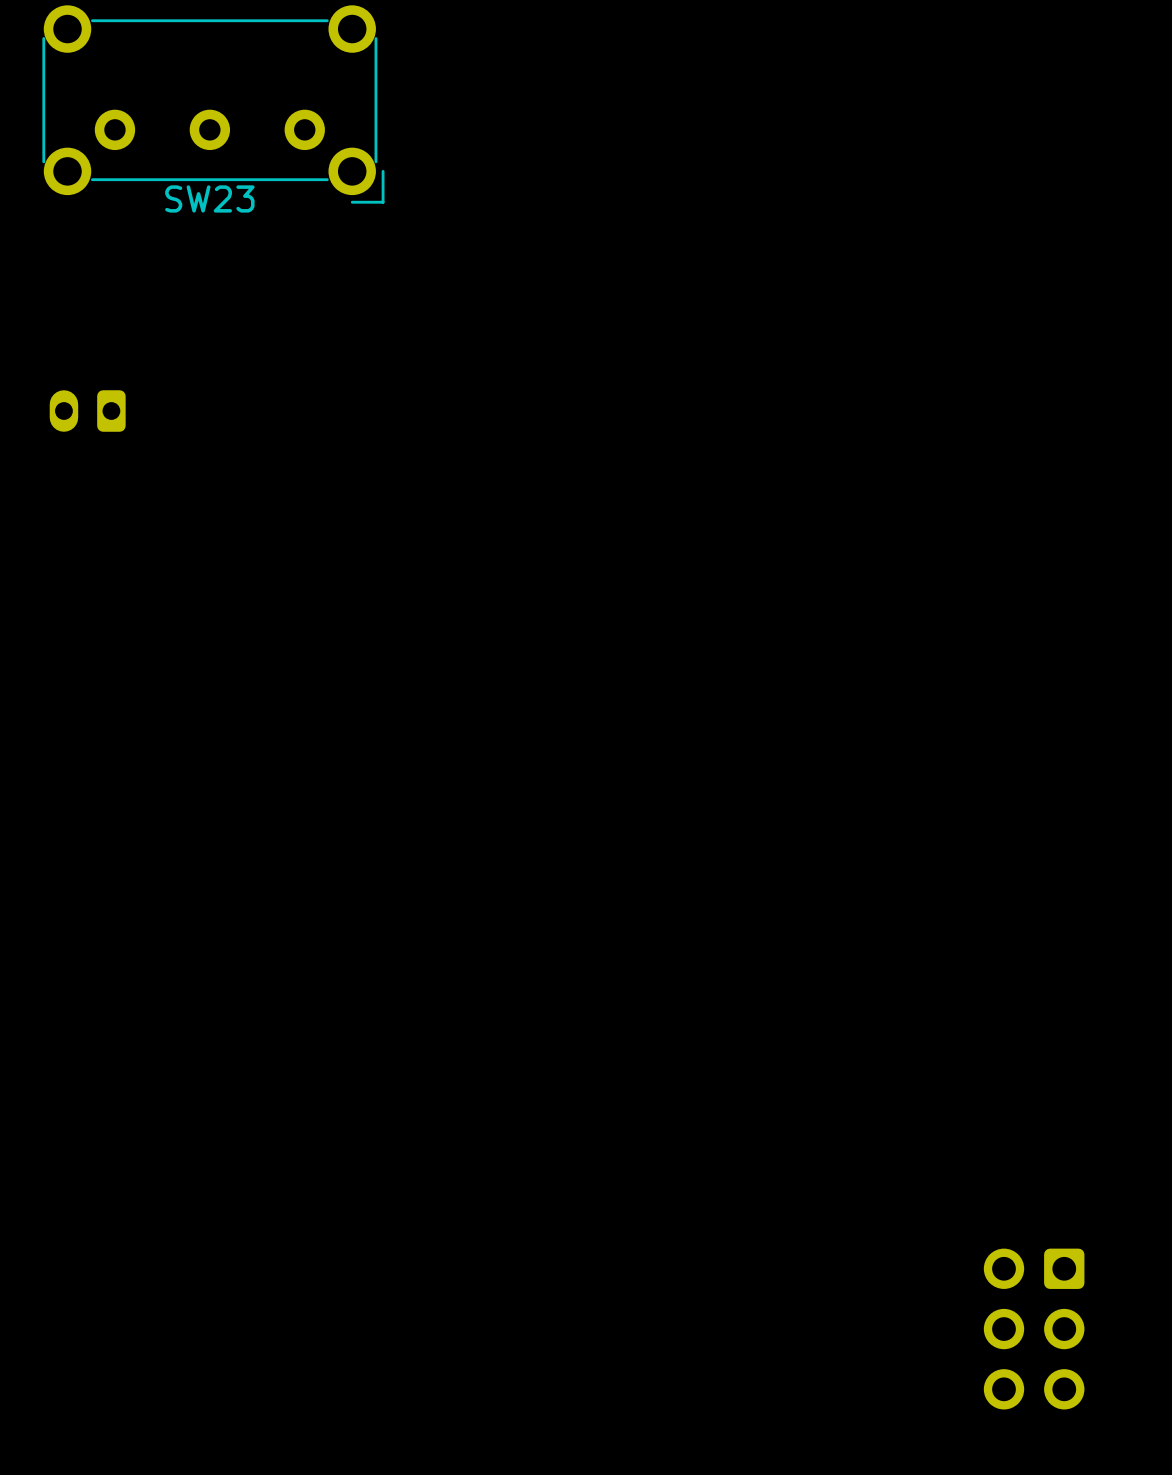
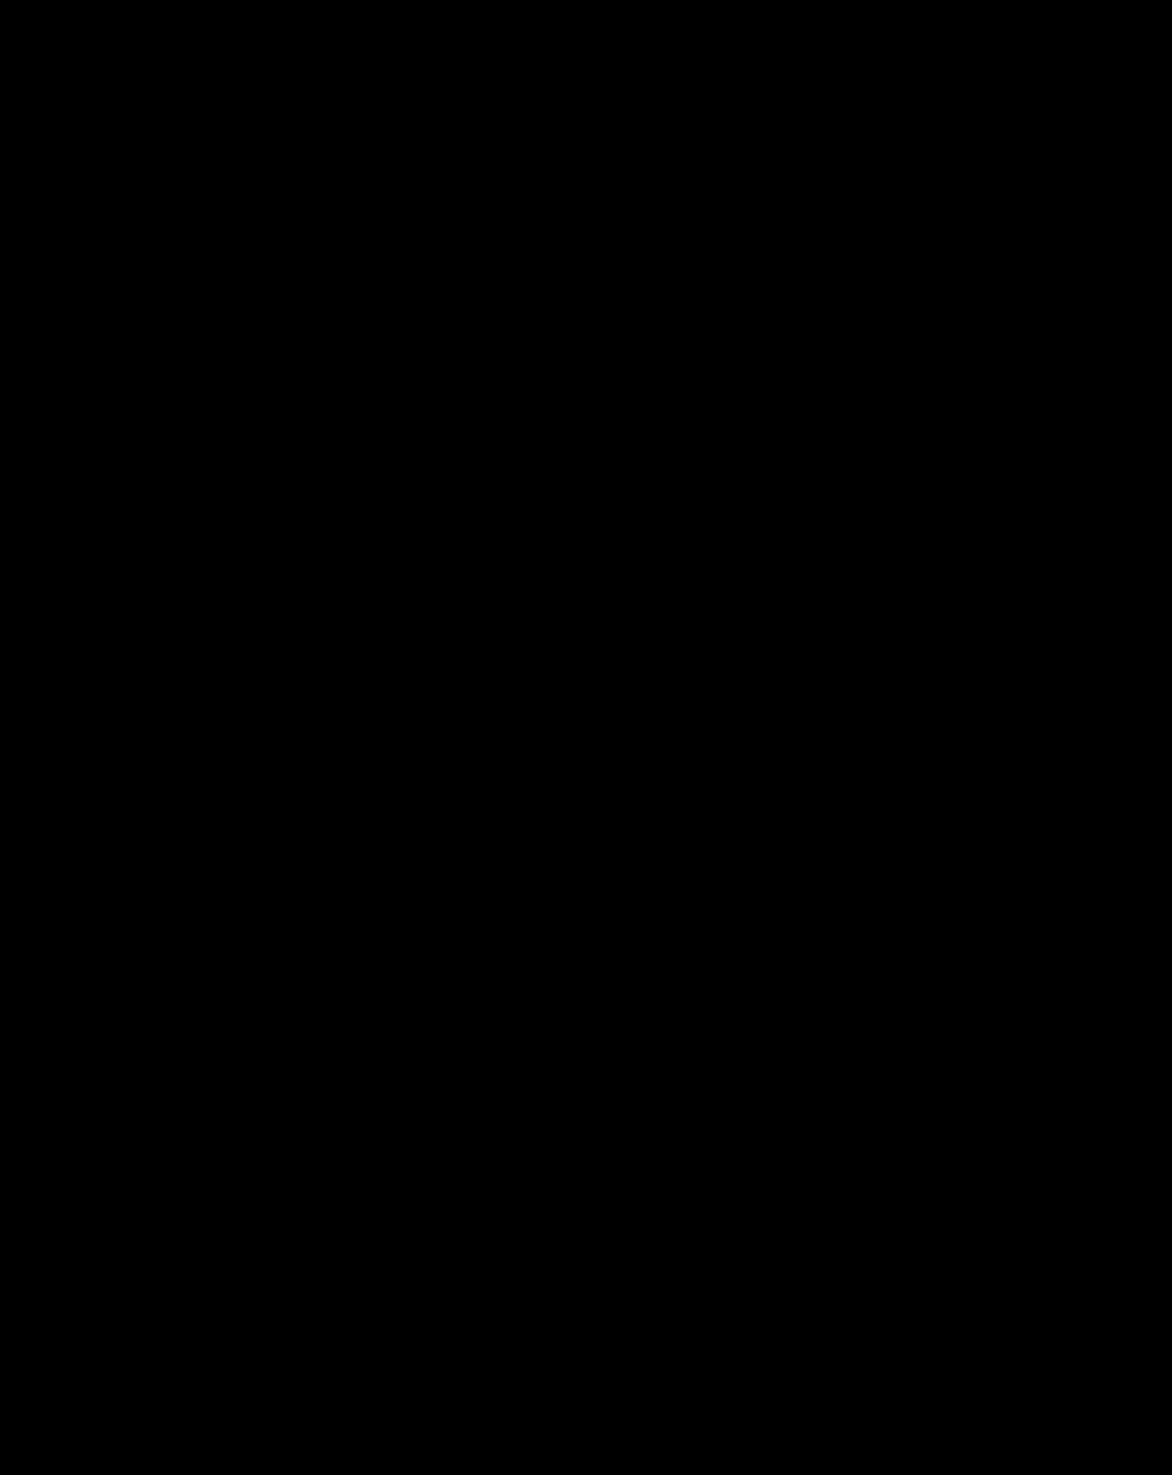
SW23: (213, 104) -> none
part: (87, 411) -> none
part: (1034, 1329) -> none

